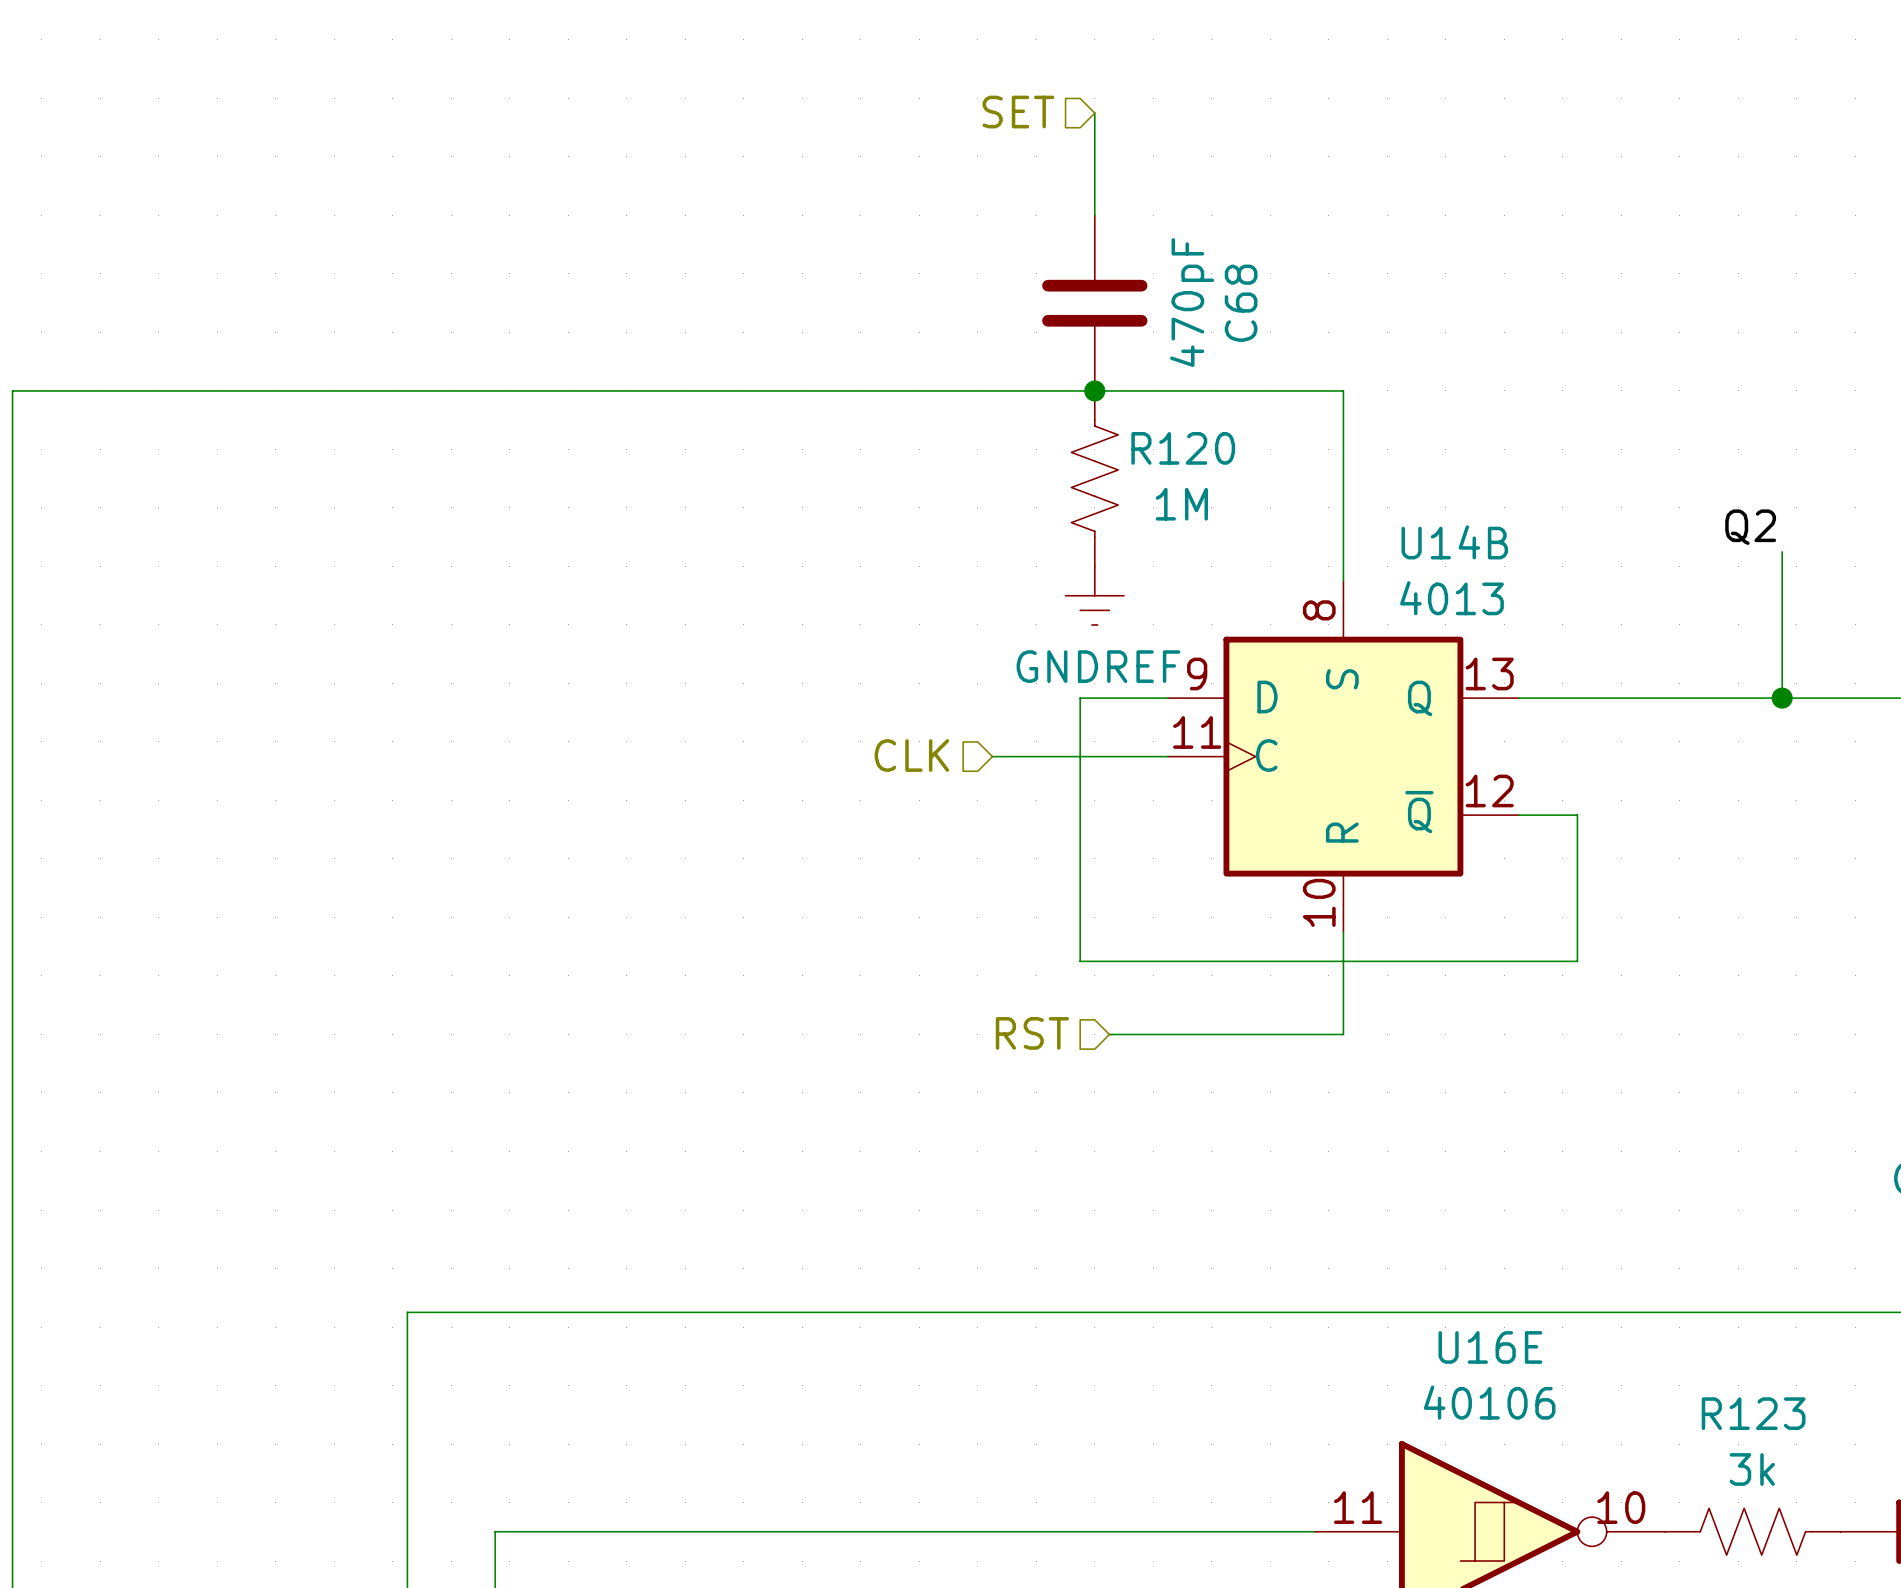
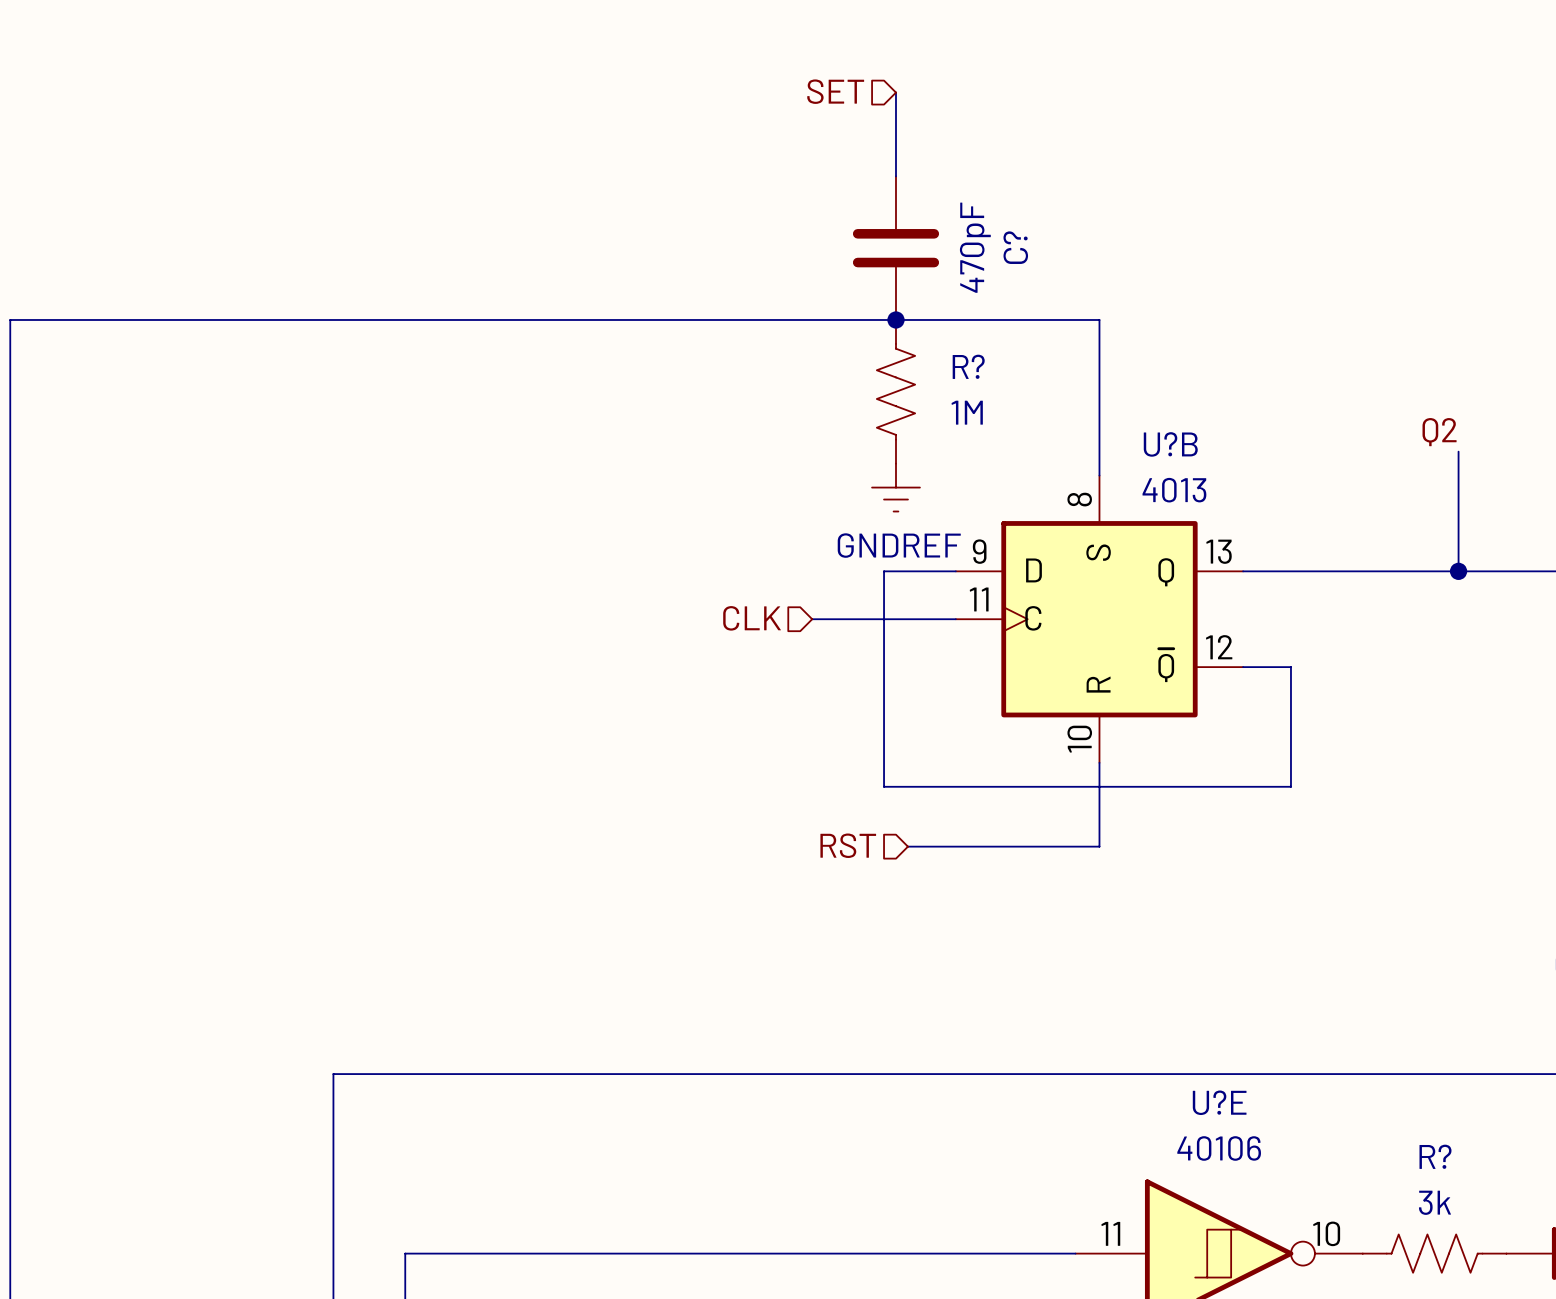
C68 name: C68 (1241, 303) -> C? (1015, 247)
R120 name: R120 (1183, 448) -> R? (968, 366)
U14B name: U14B (1454, 542) -> U?B (1170, 444)
U16E name: U16E (1490, 1347) -> U?E (1219, 1102)
R123 name: R123 (1753, 1413) -> R? (1435, 1156)

